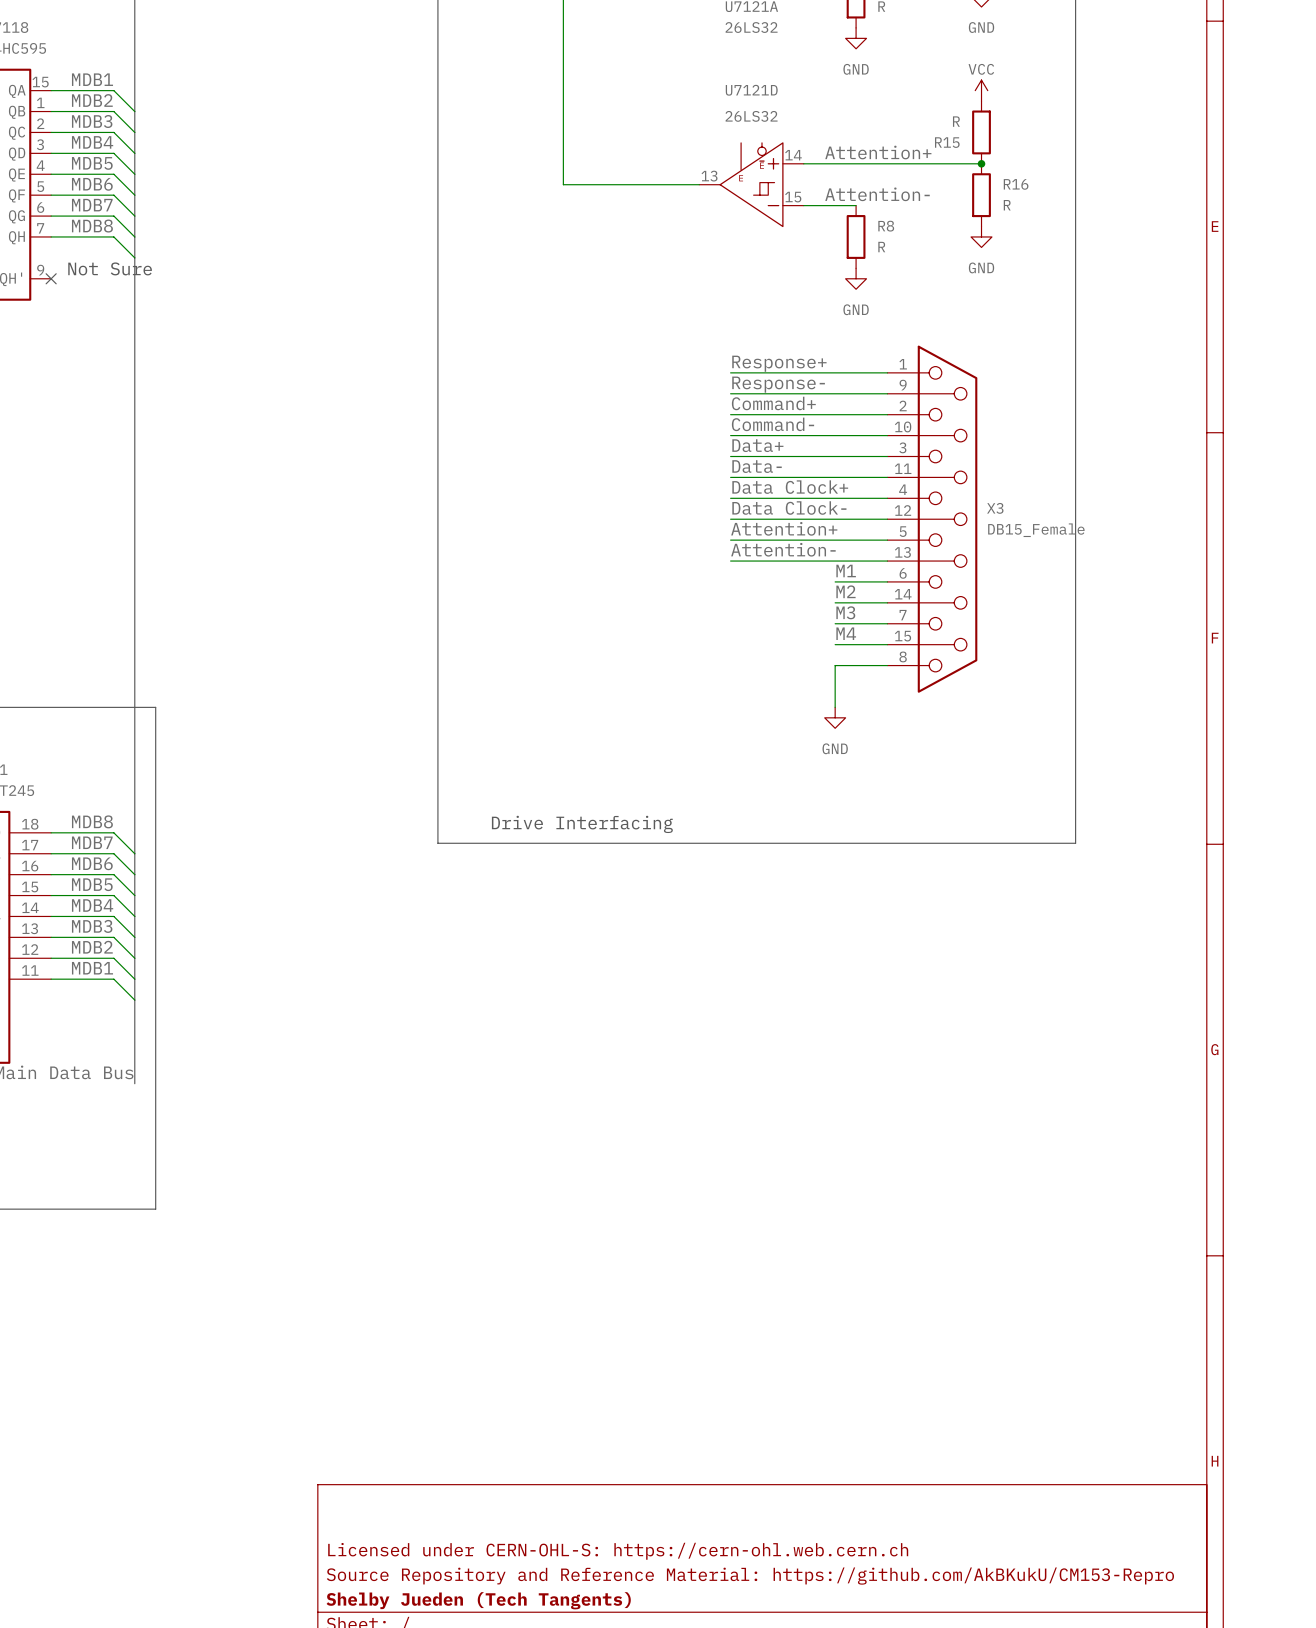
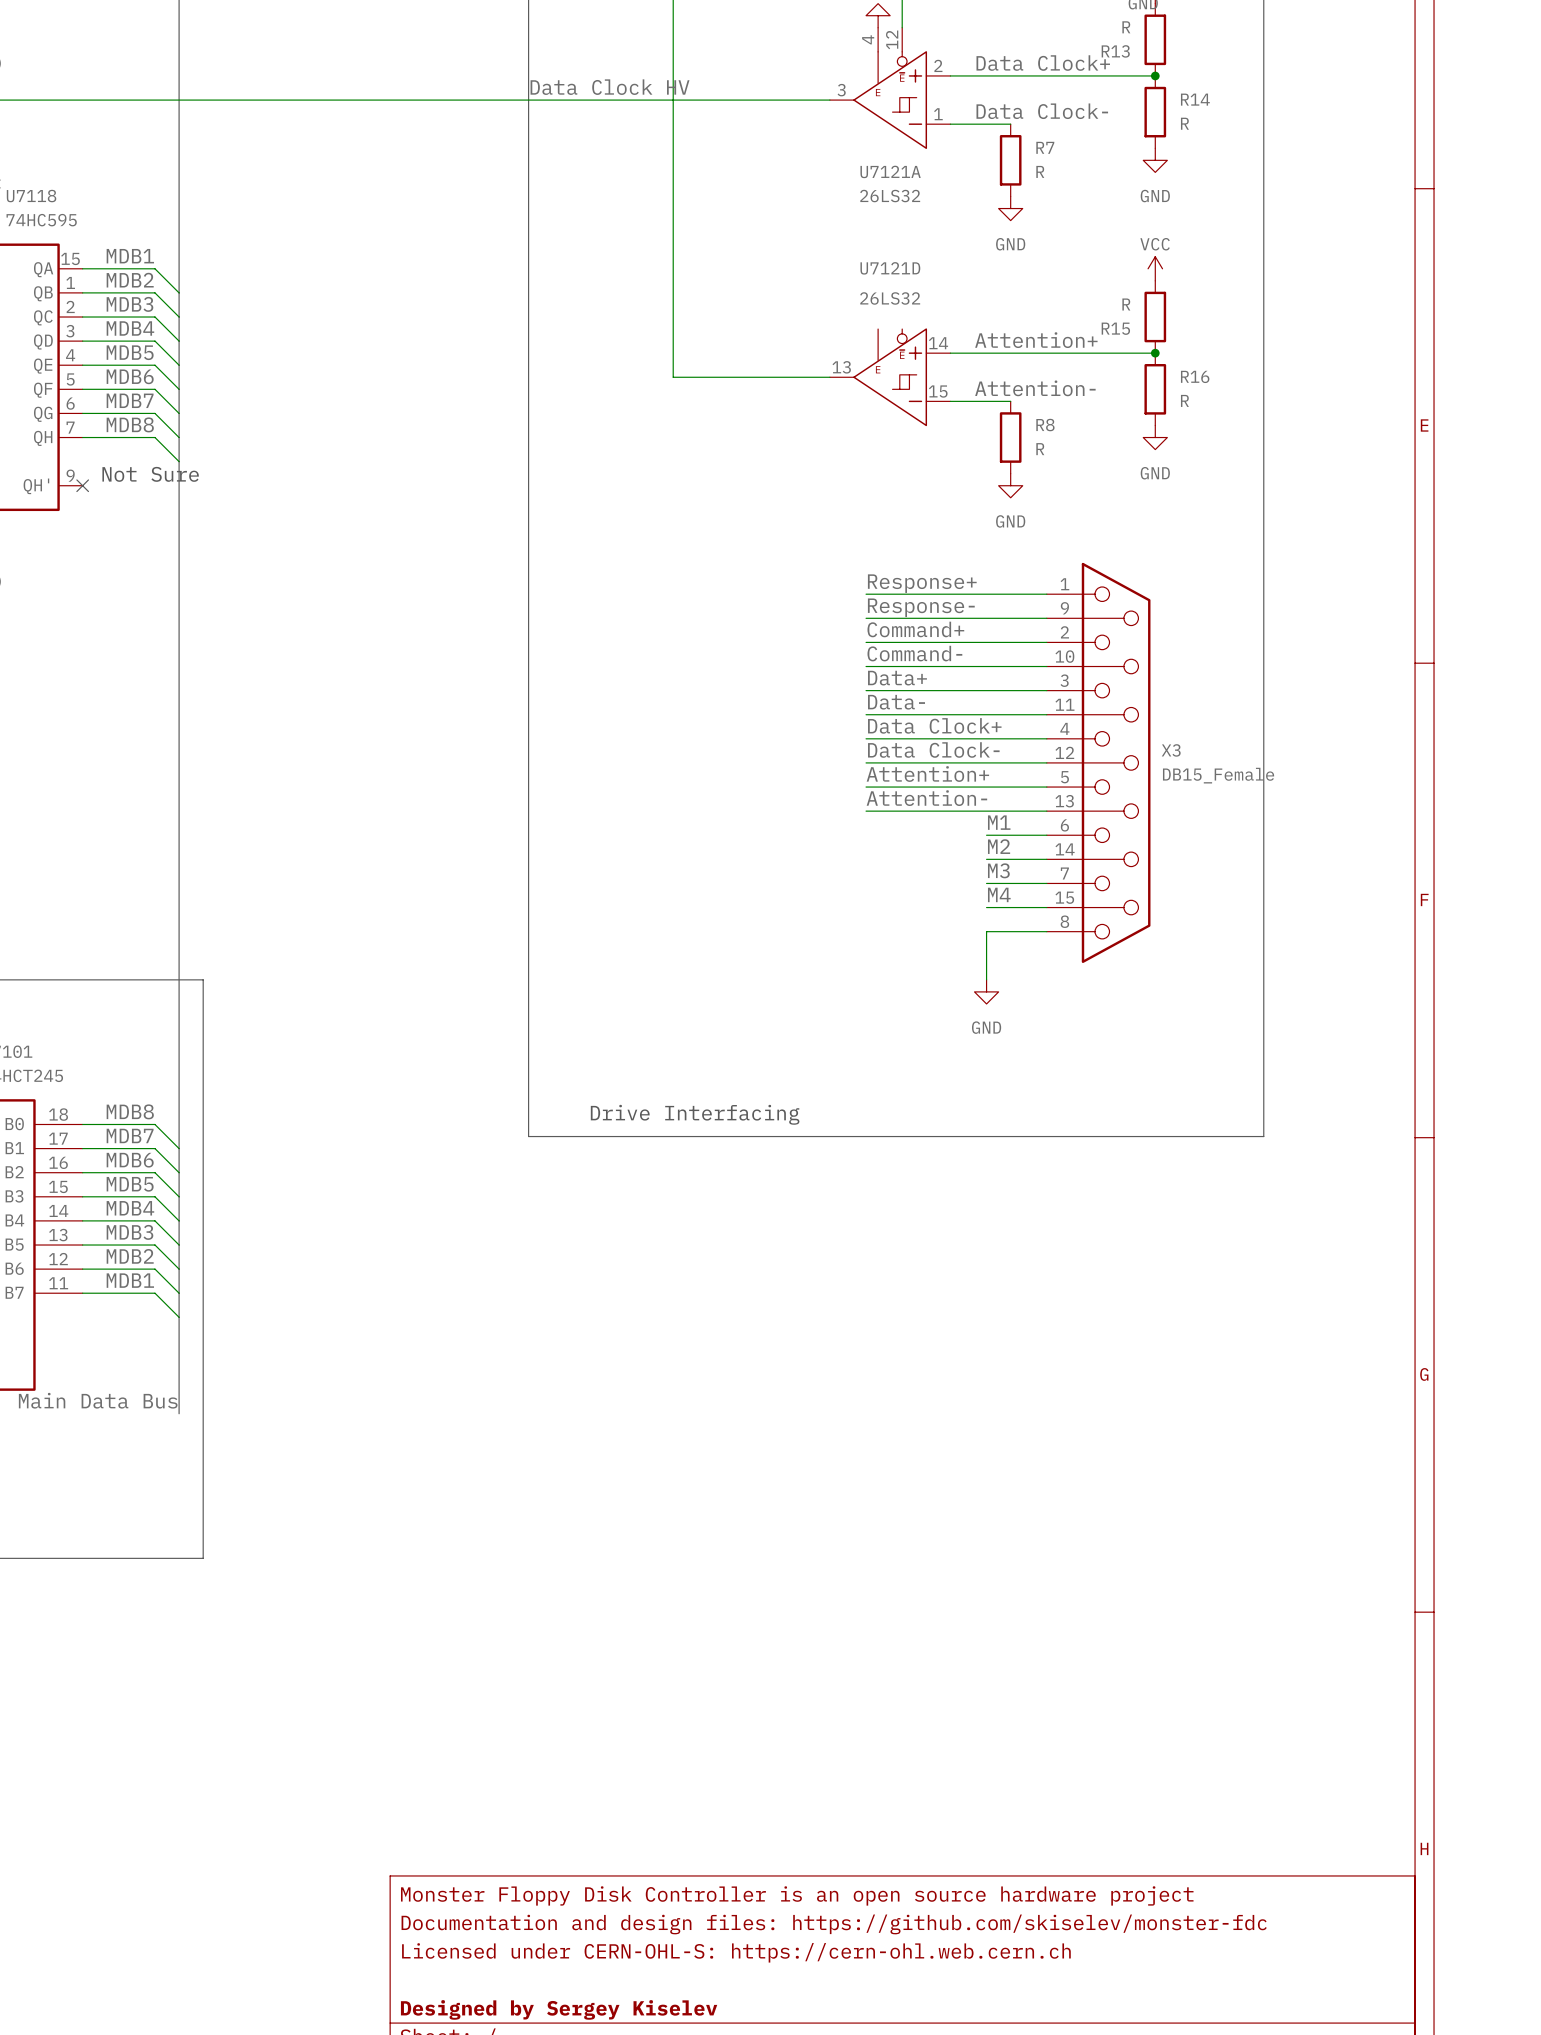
title block: none -> Monster Floppy Disk Controller is an open source hardware project (797, 1895)
title block: none -> Documentation and design files: https://github.com/skiselev/monster-fdc (834, 1924)
title block: Source Repository and Reference Material: https://github.com/AkBKukU/CM153-Repro (750, 1576) -> none
title block: Shelby Jueden (Tech Tangents) (478, 1600) -> Designed by Sergey Kiselev (559, 2009)

